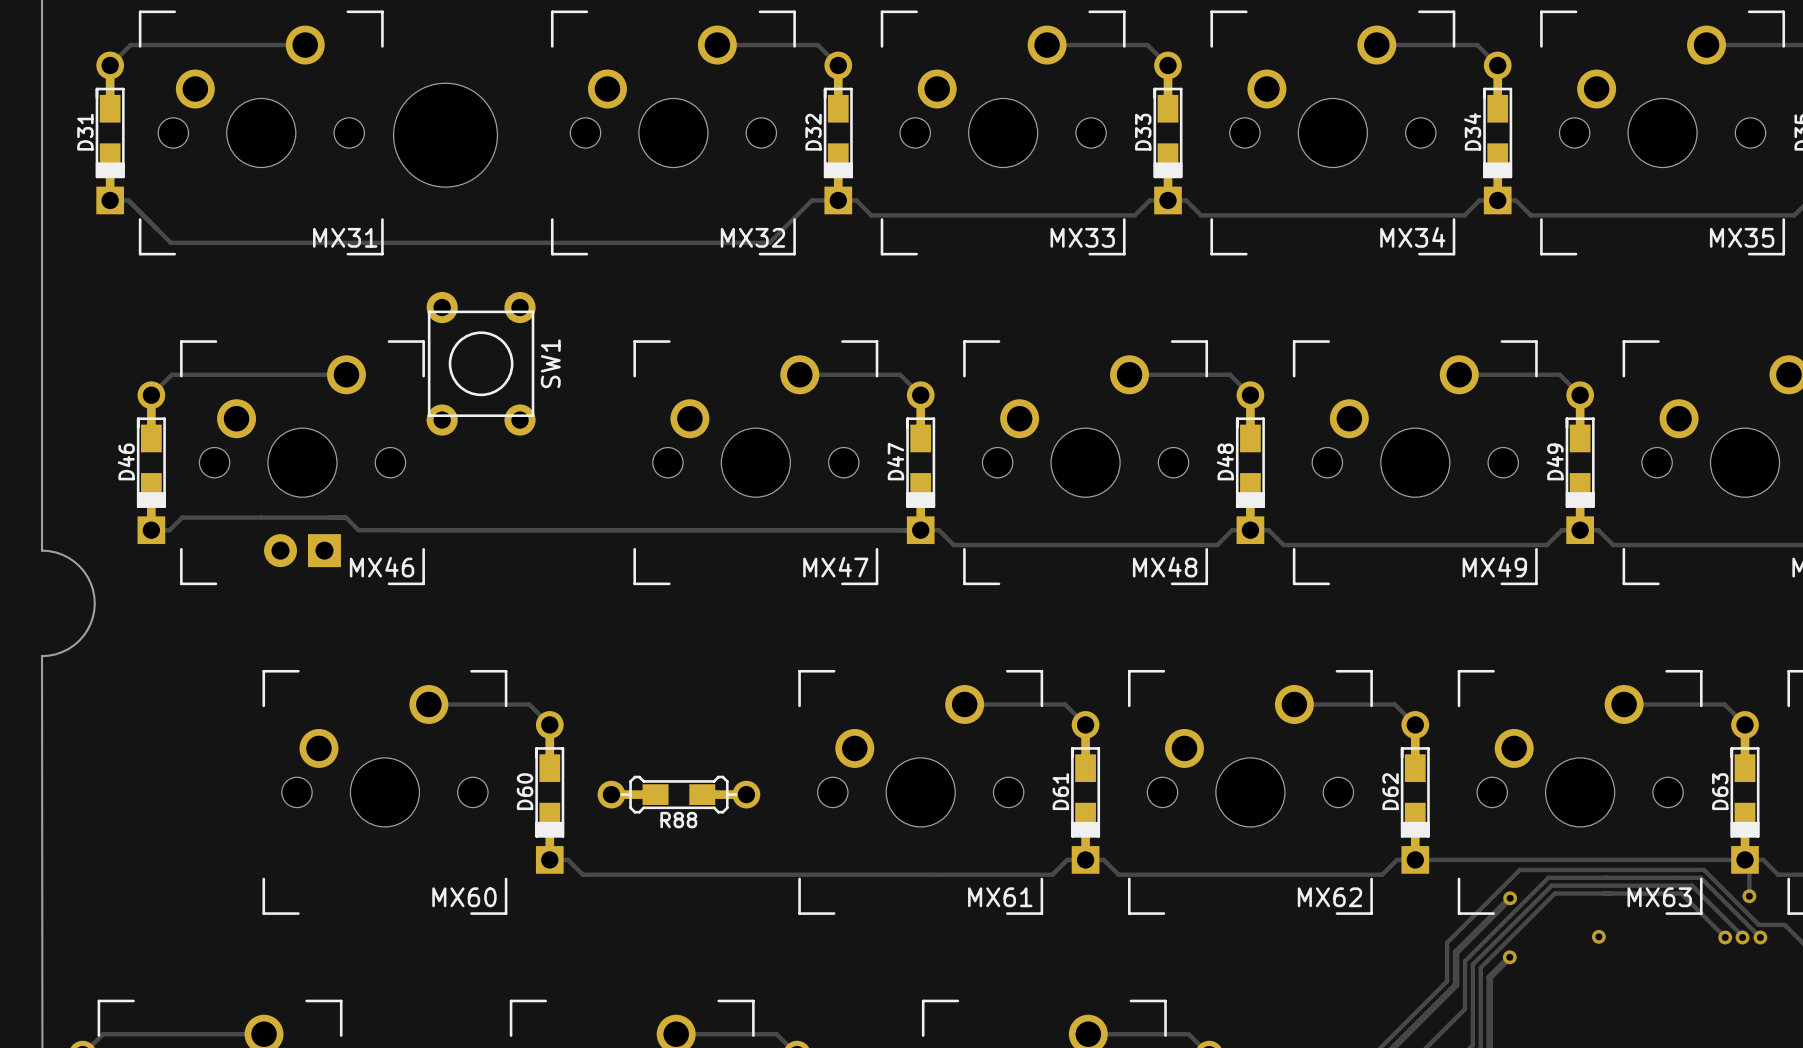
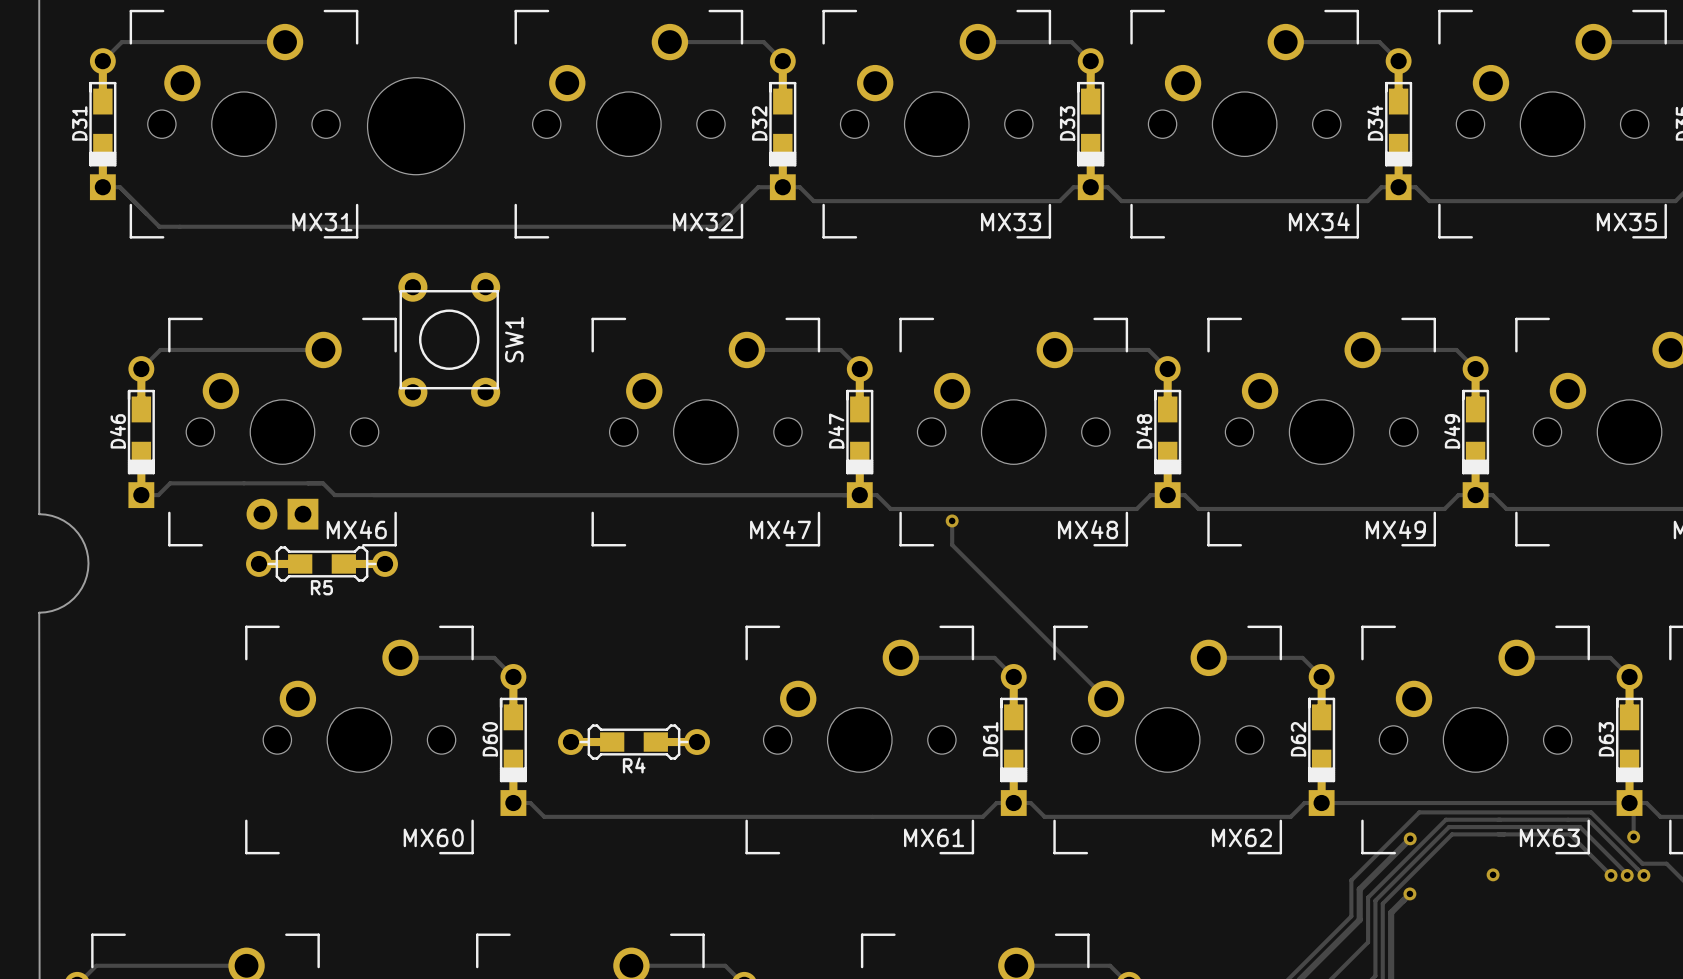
track: none -> (952, 520) (952, 544) (1106, 698)
via: none -> (952, 520)
R5: none -> (322, 563)
R88 name: R88 (678, 820) -> R4 (634, 765)

